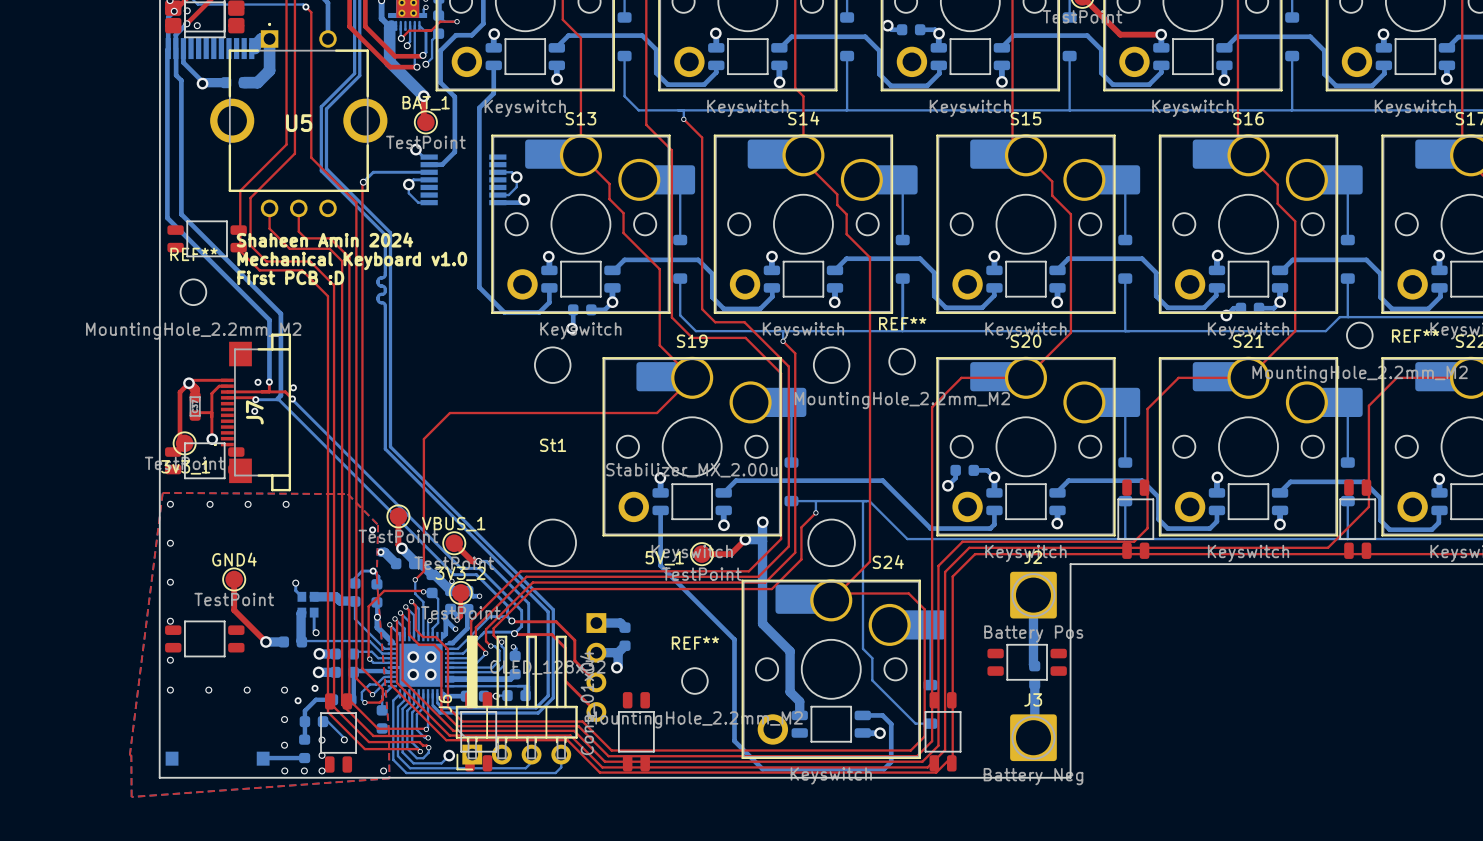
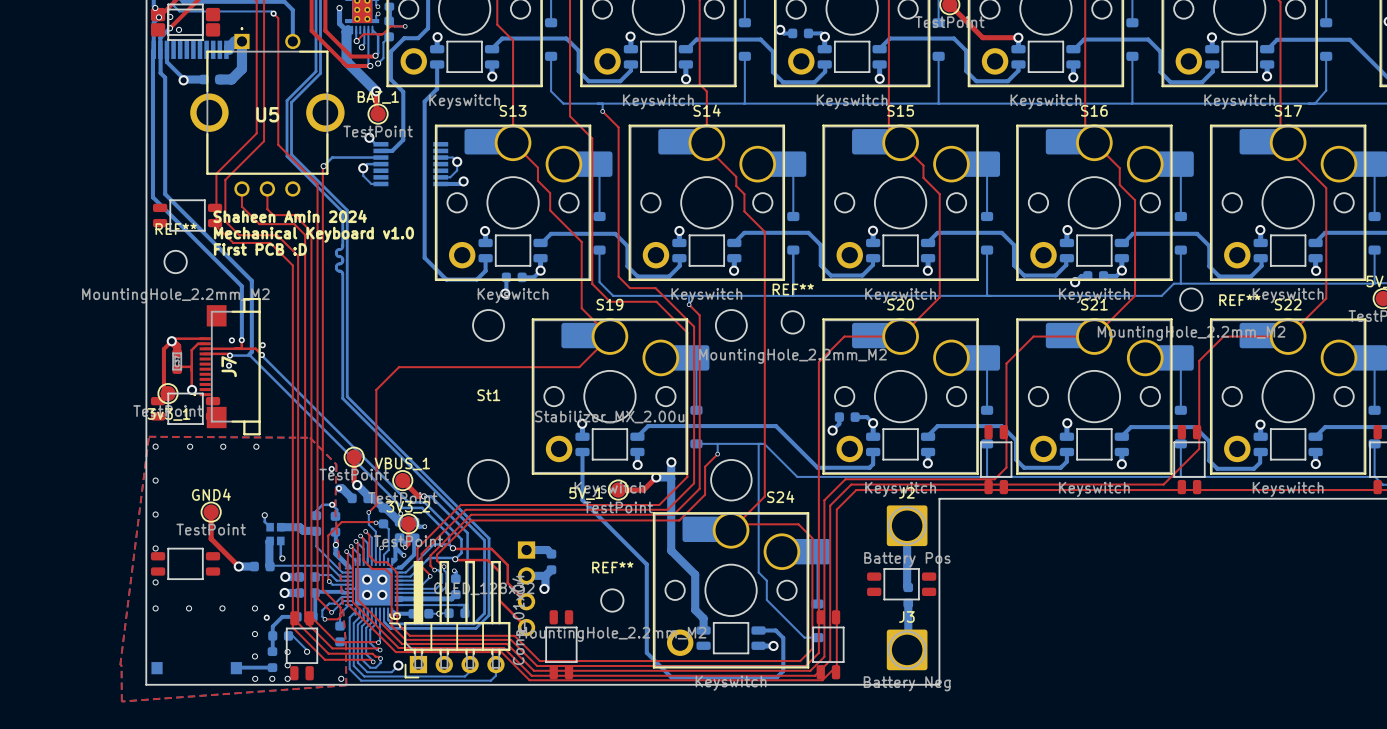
part: (478, 731) -> none

